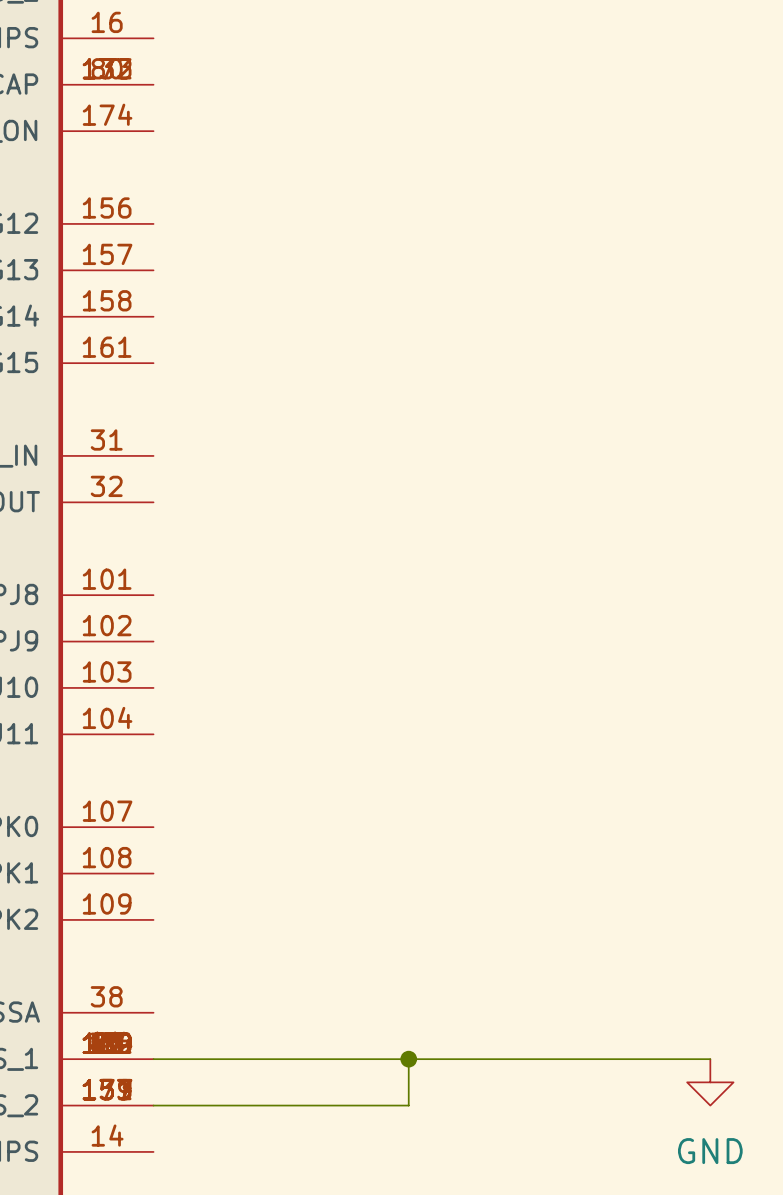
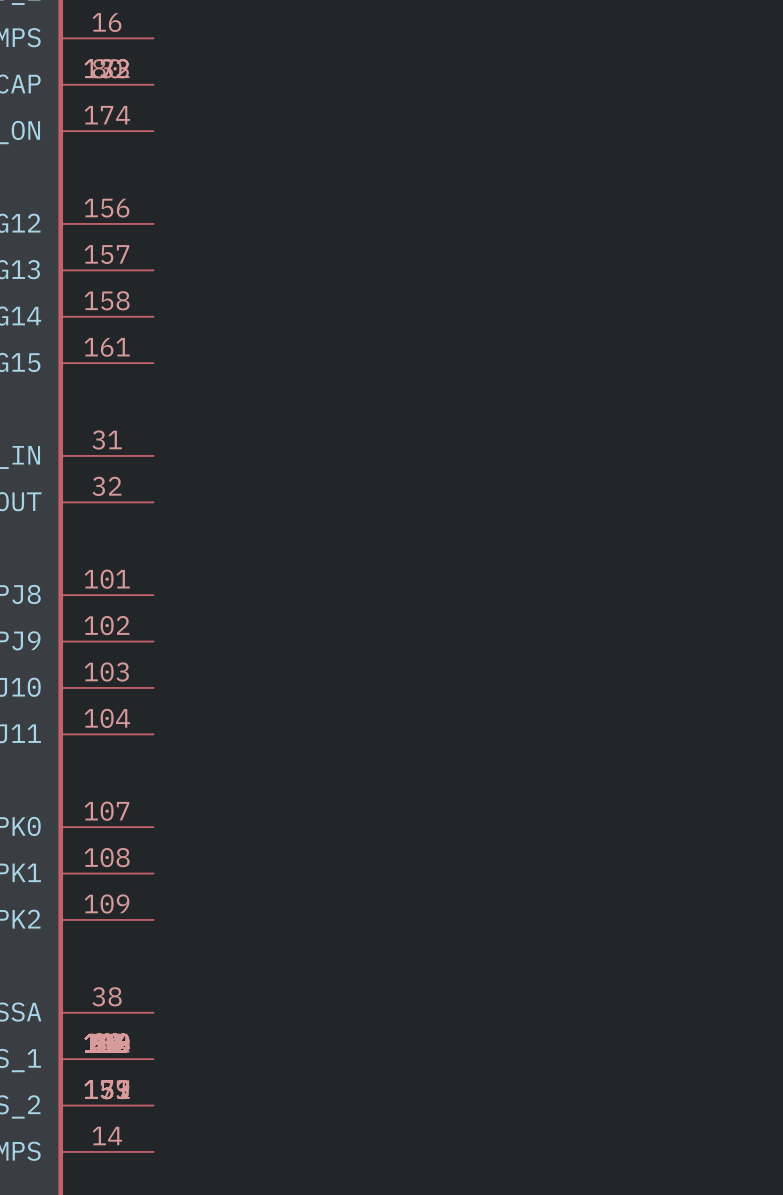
wire: (153, 1059) (710, 1059) -> none
wire: (408, 1059) (408, 1105) (153, 1105) -> none
junction: (408, 1059) -> none
power symbol: GND (710, 1082) -> none

